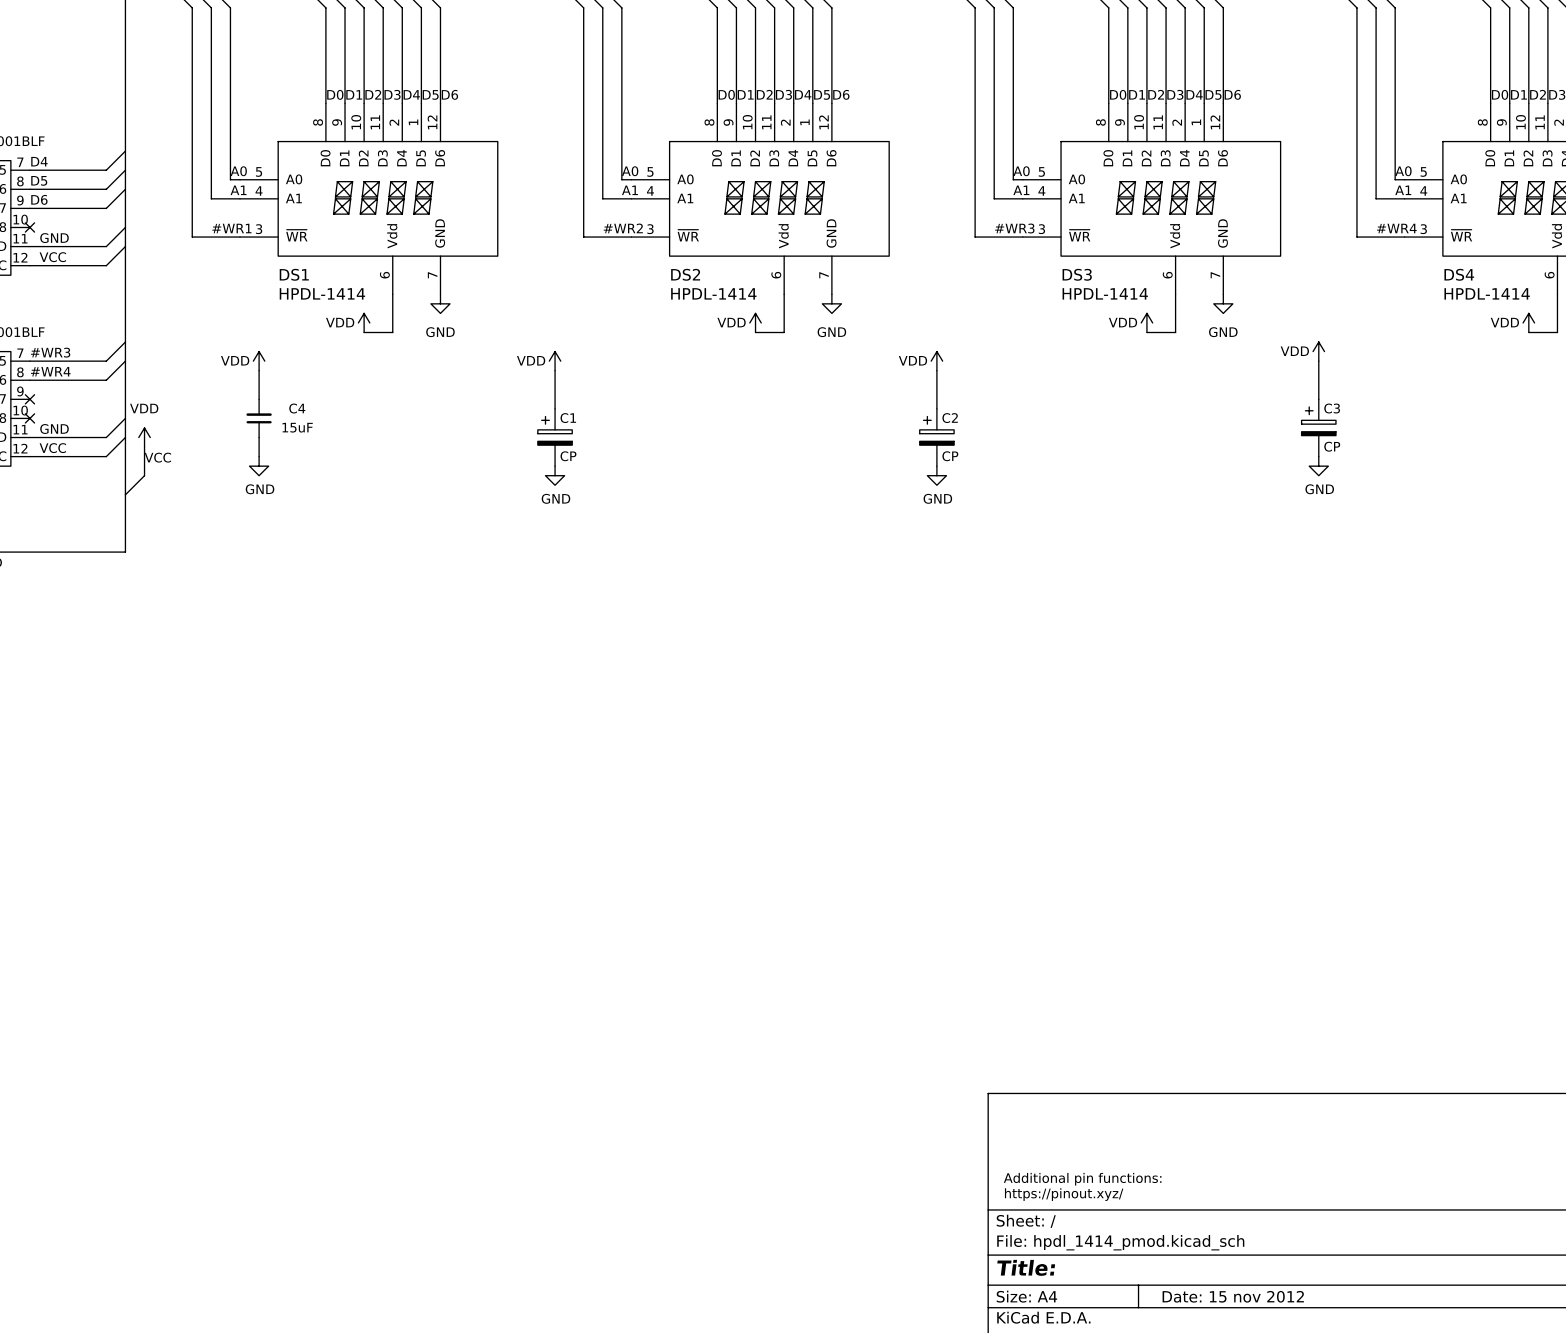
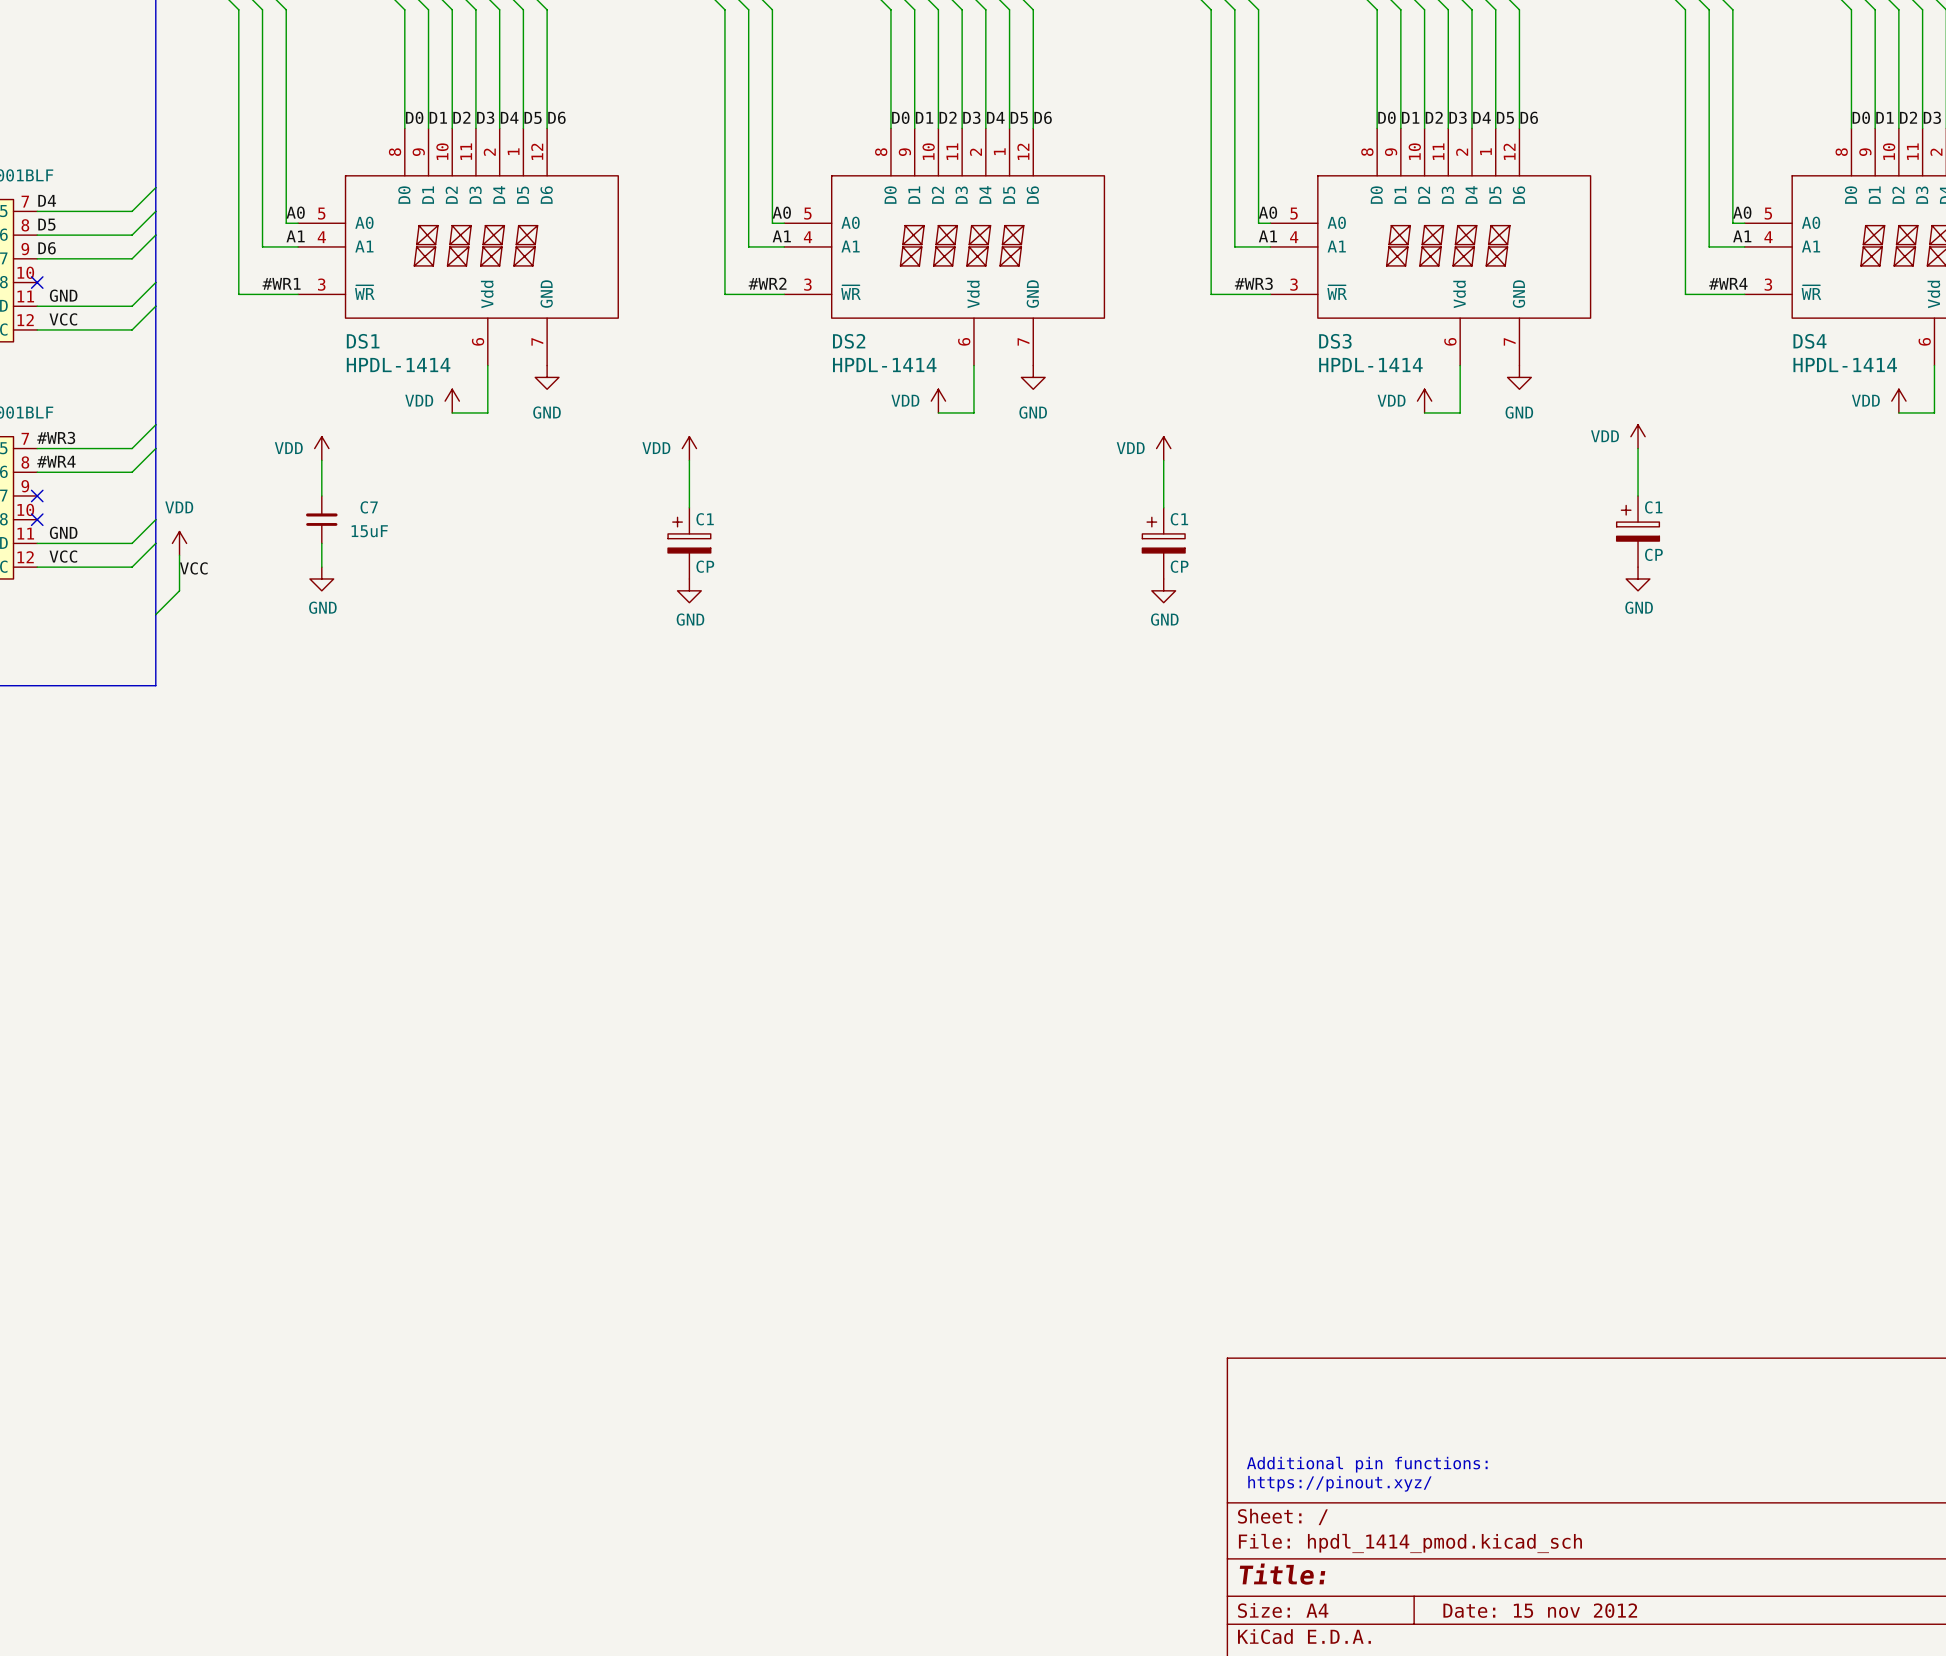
C4 name: C4 (297, 408) -> C7 (369, 507)
C3 name: C3 (1332, 408) -> C1 (1653, 507)
C2 name: C2 (950, 418) -> C1 (1179, 519)

